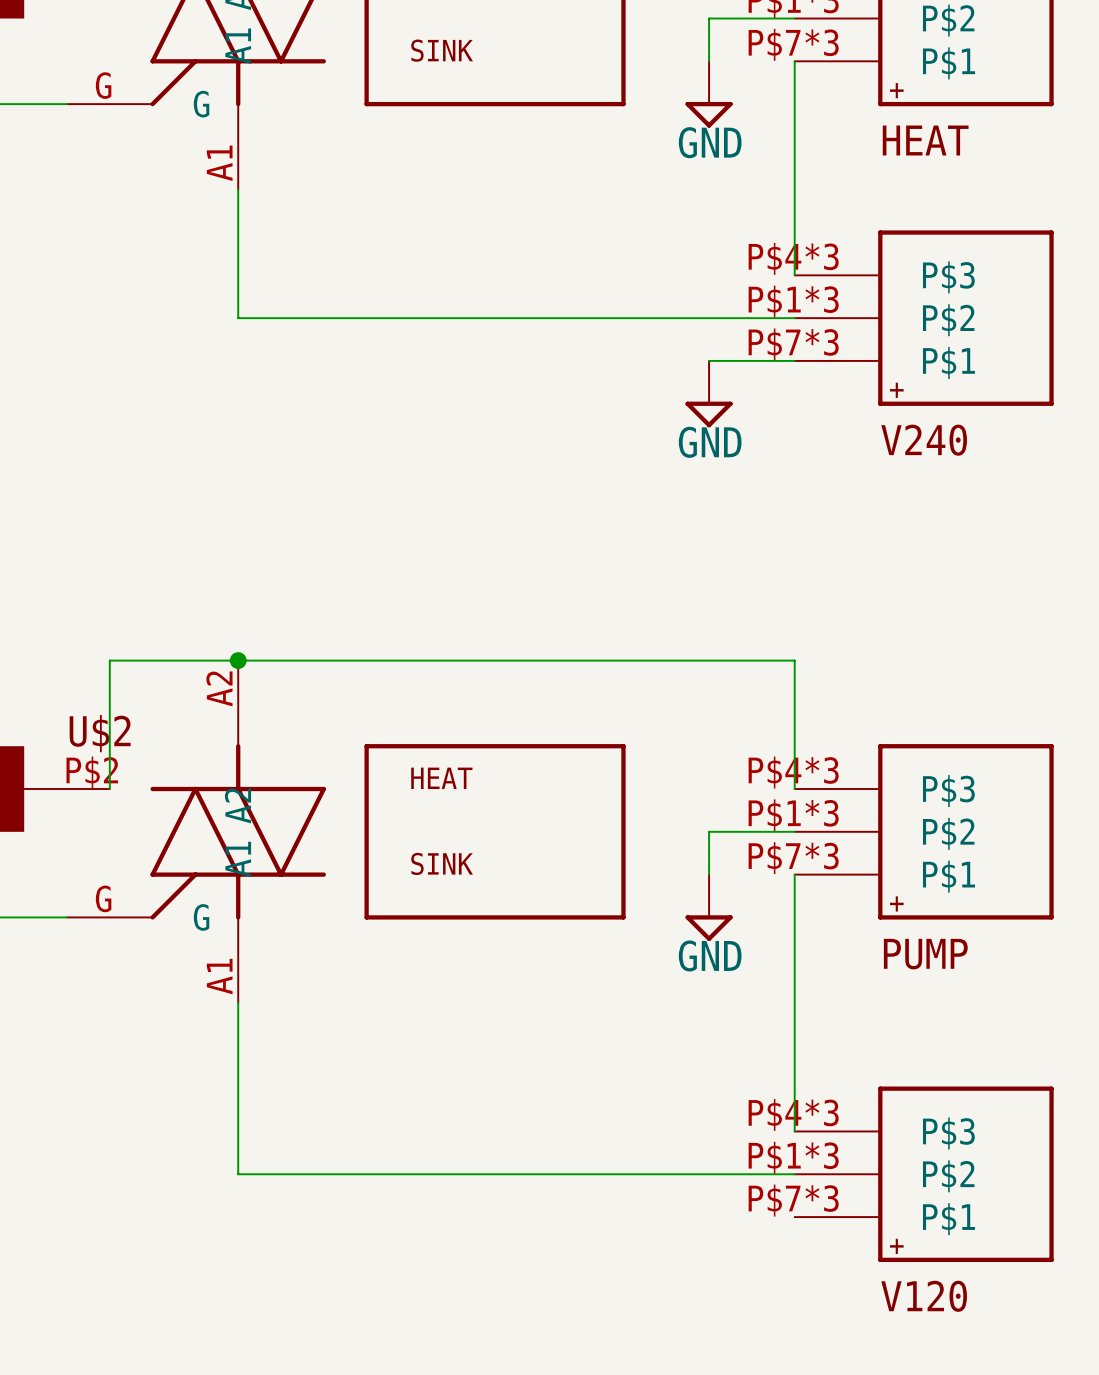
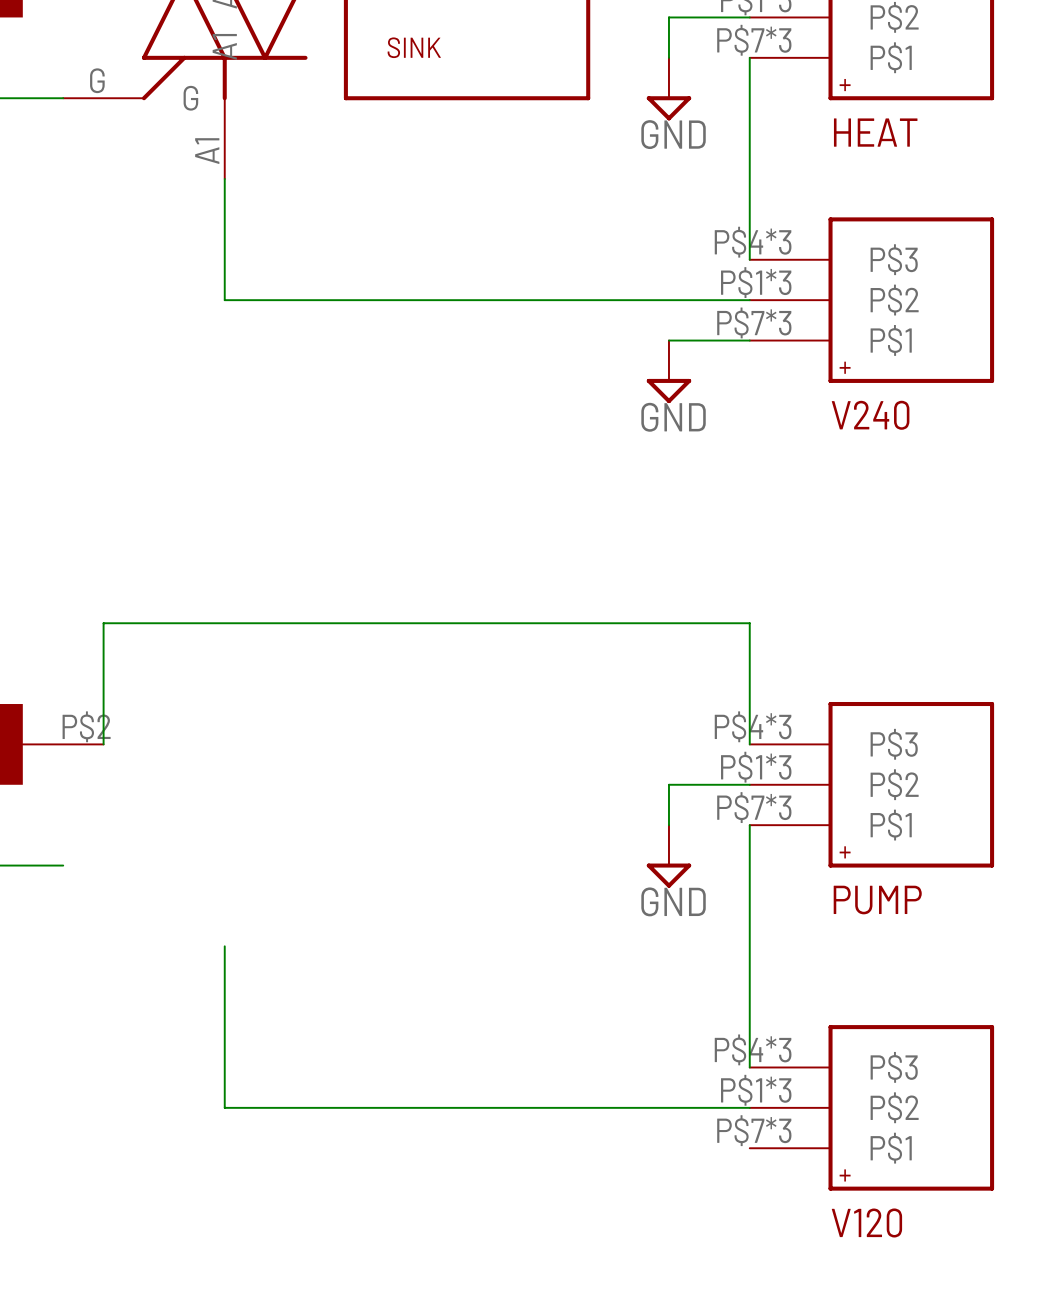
junction: (238, 660) -> none
U$2: (196, 831) -> none
part: (495, 831) -> none

